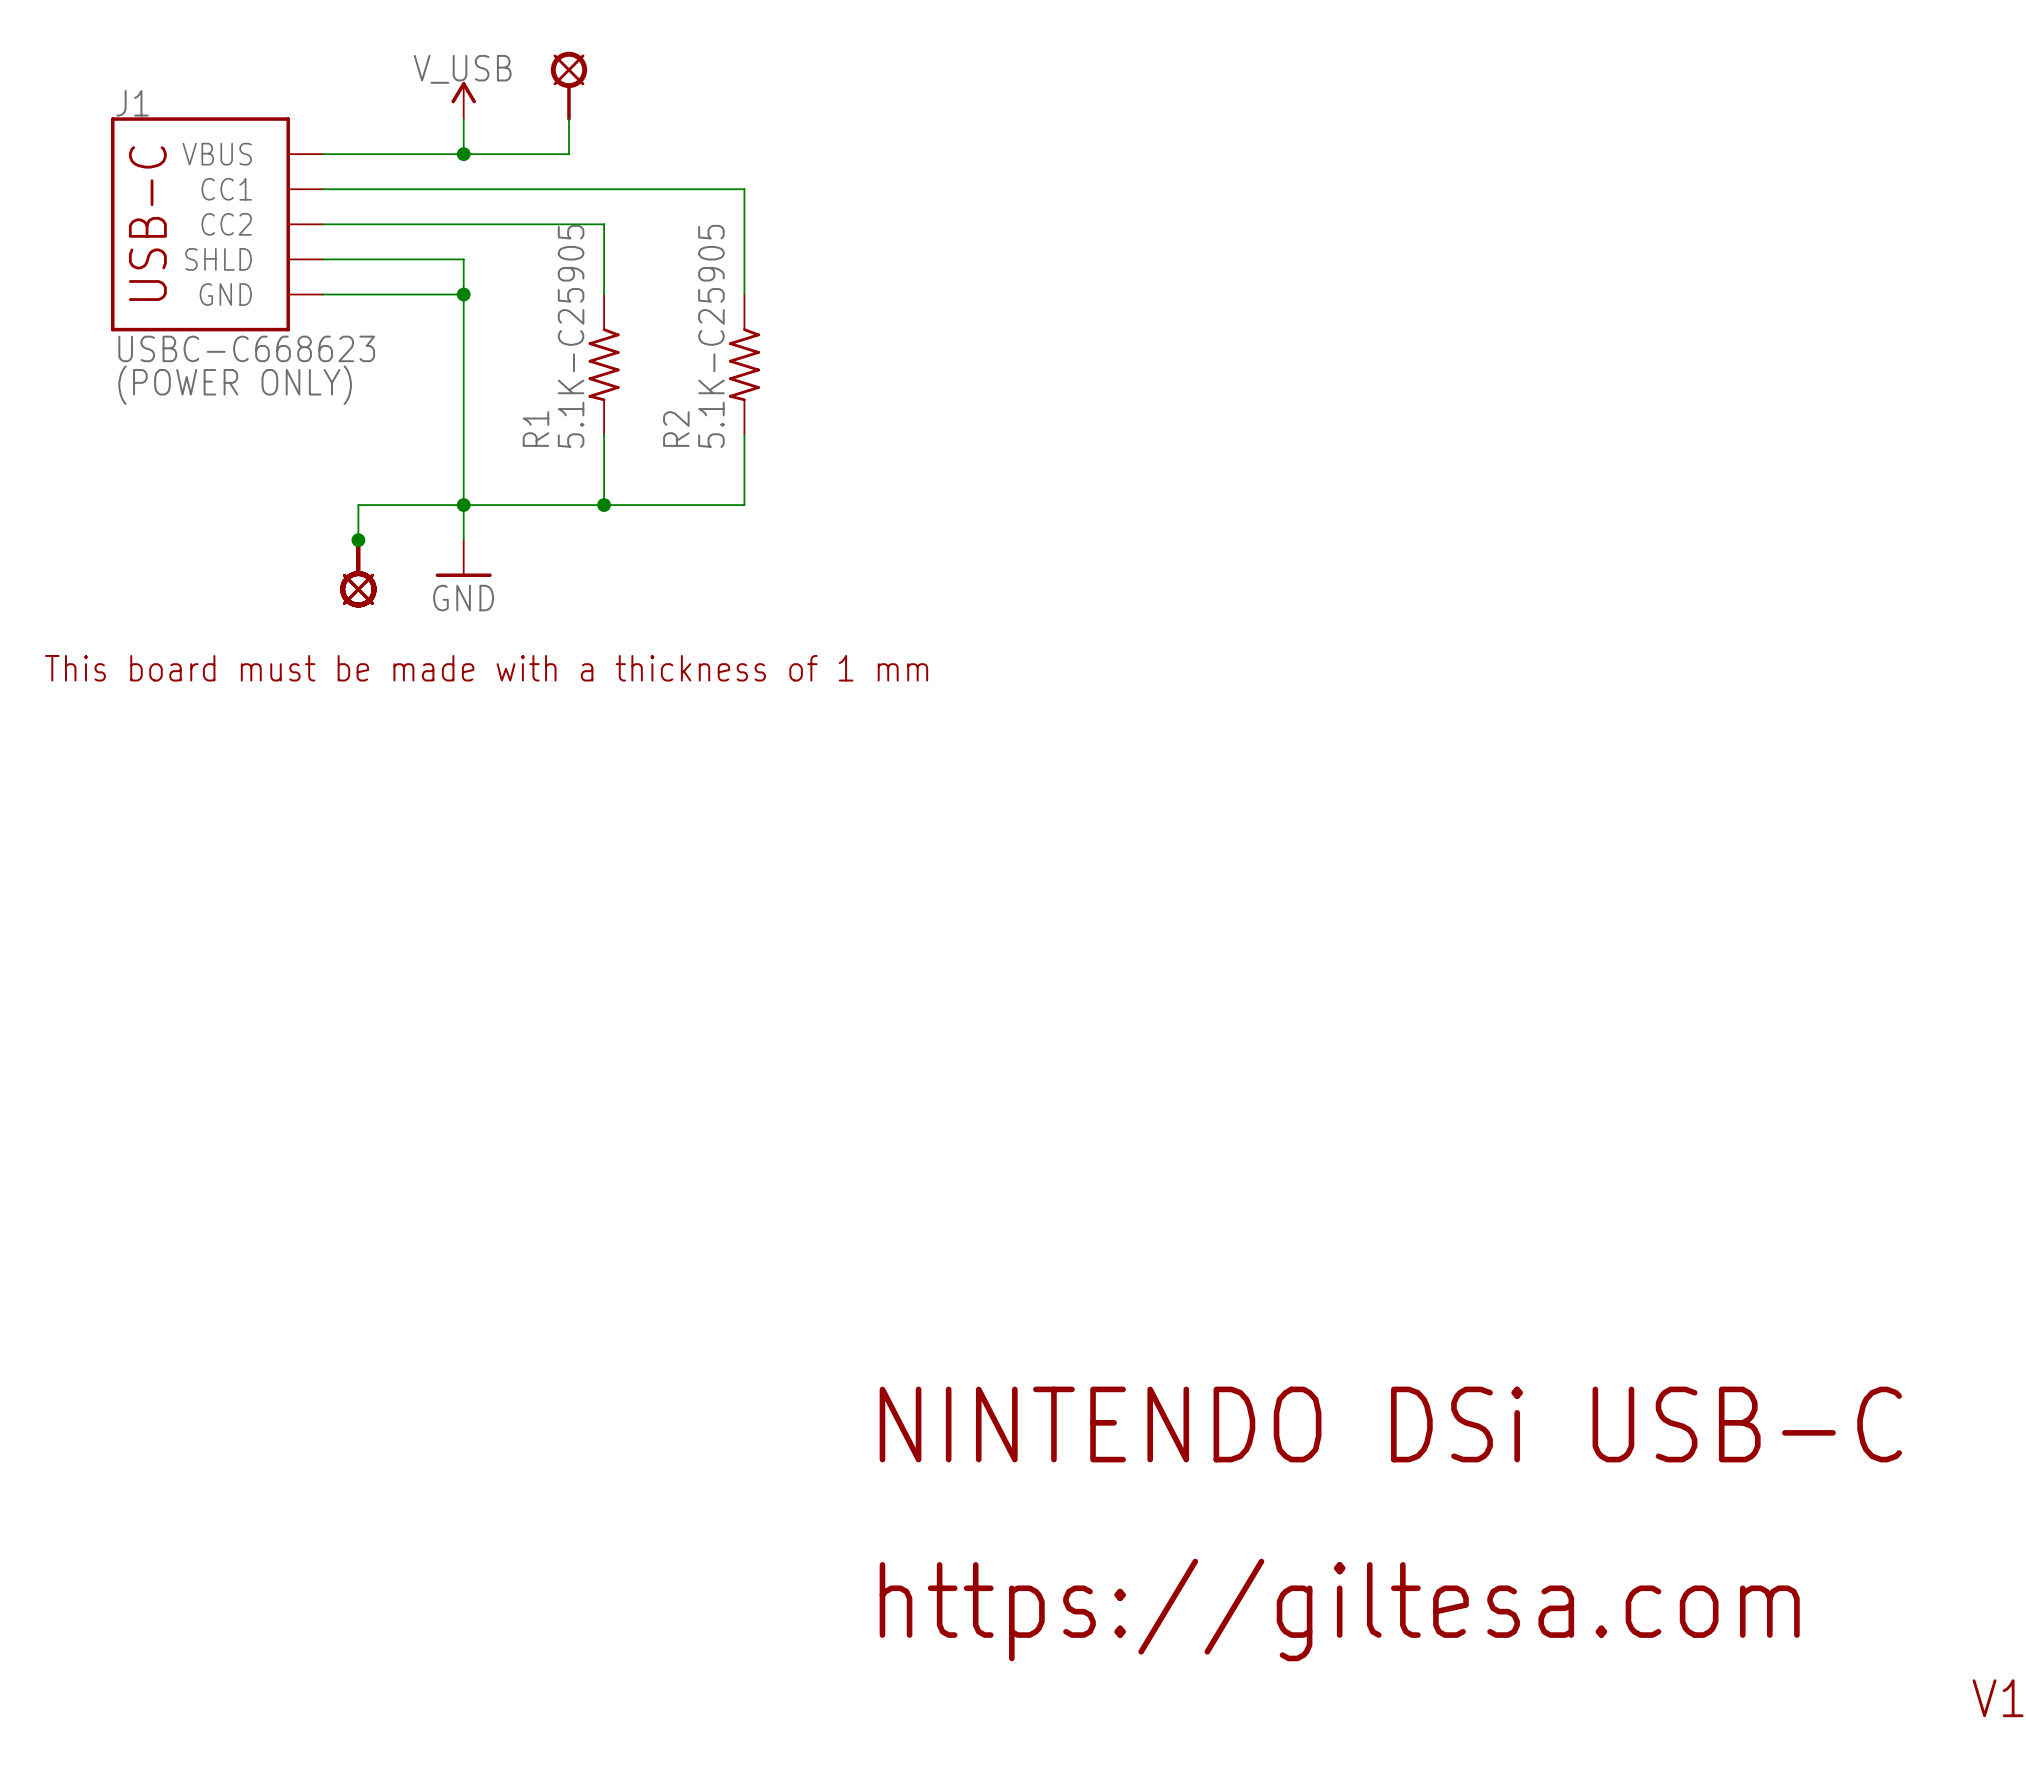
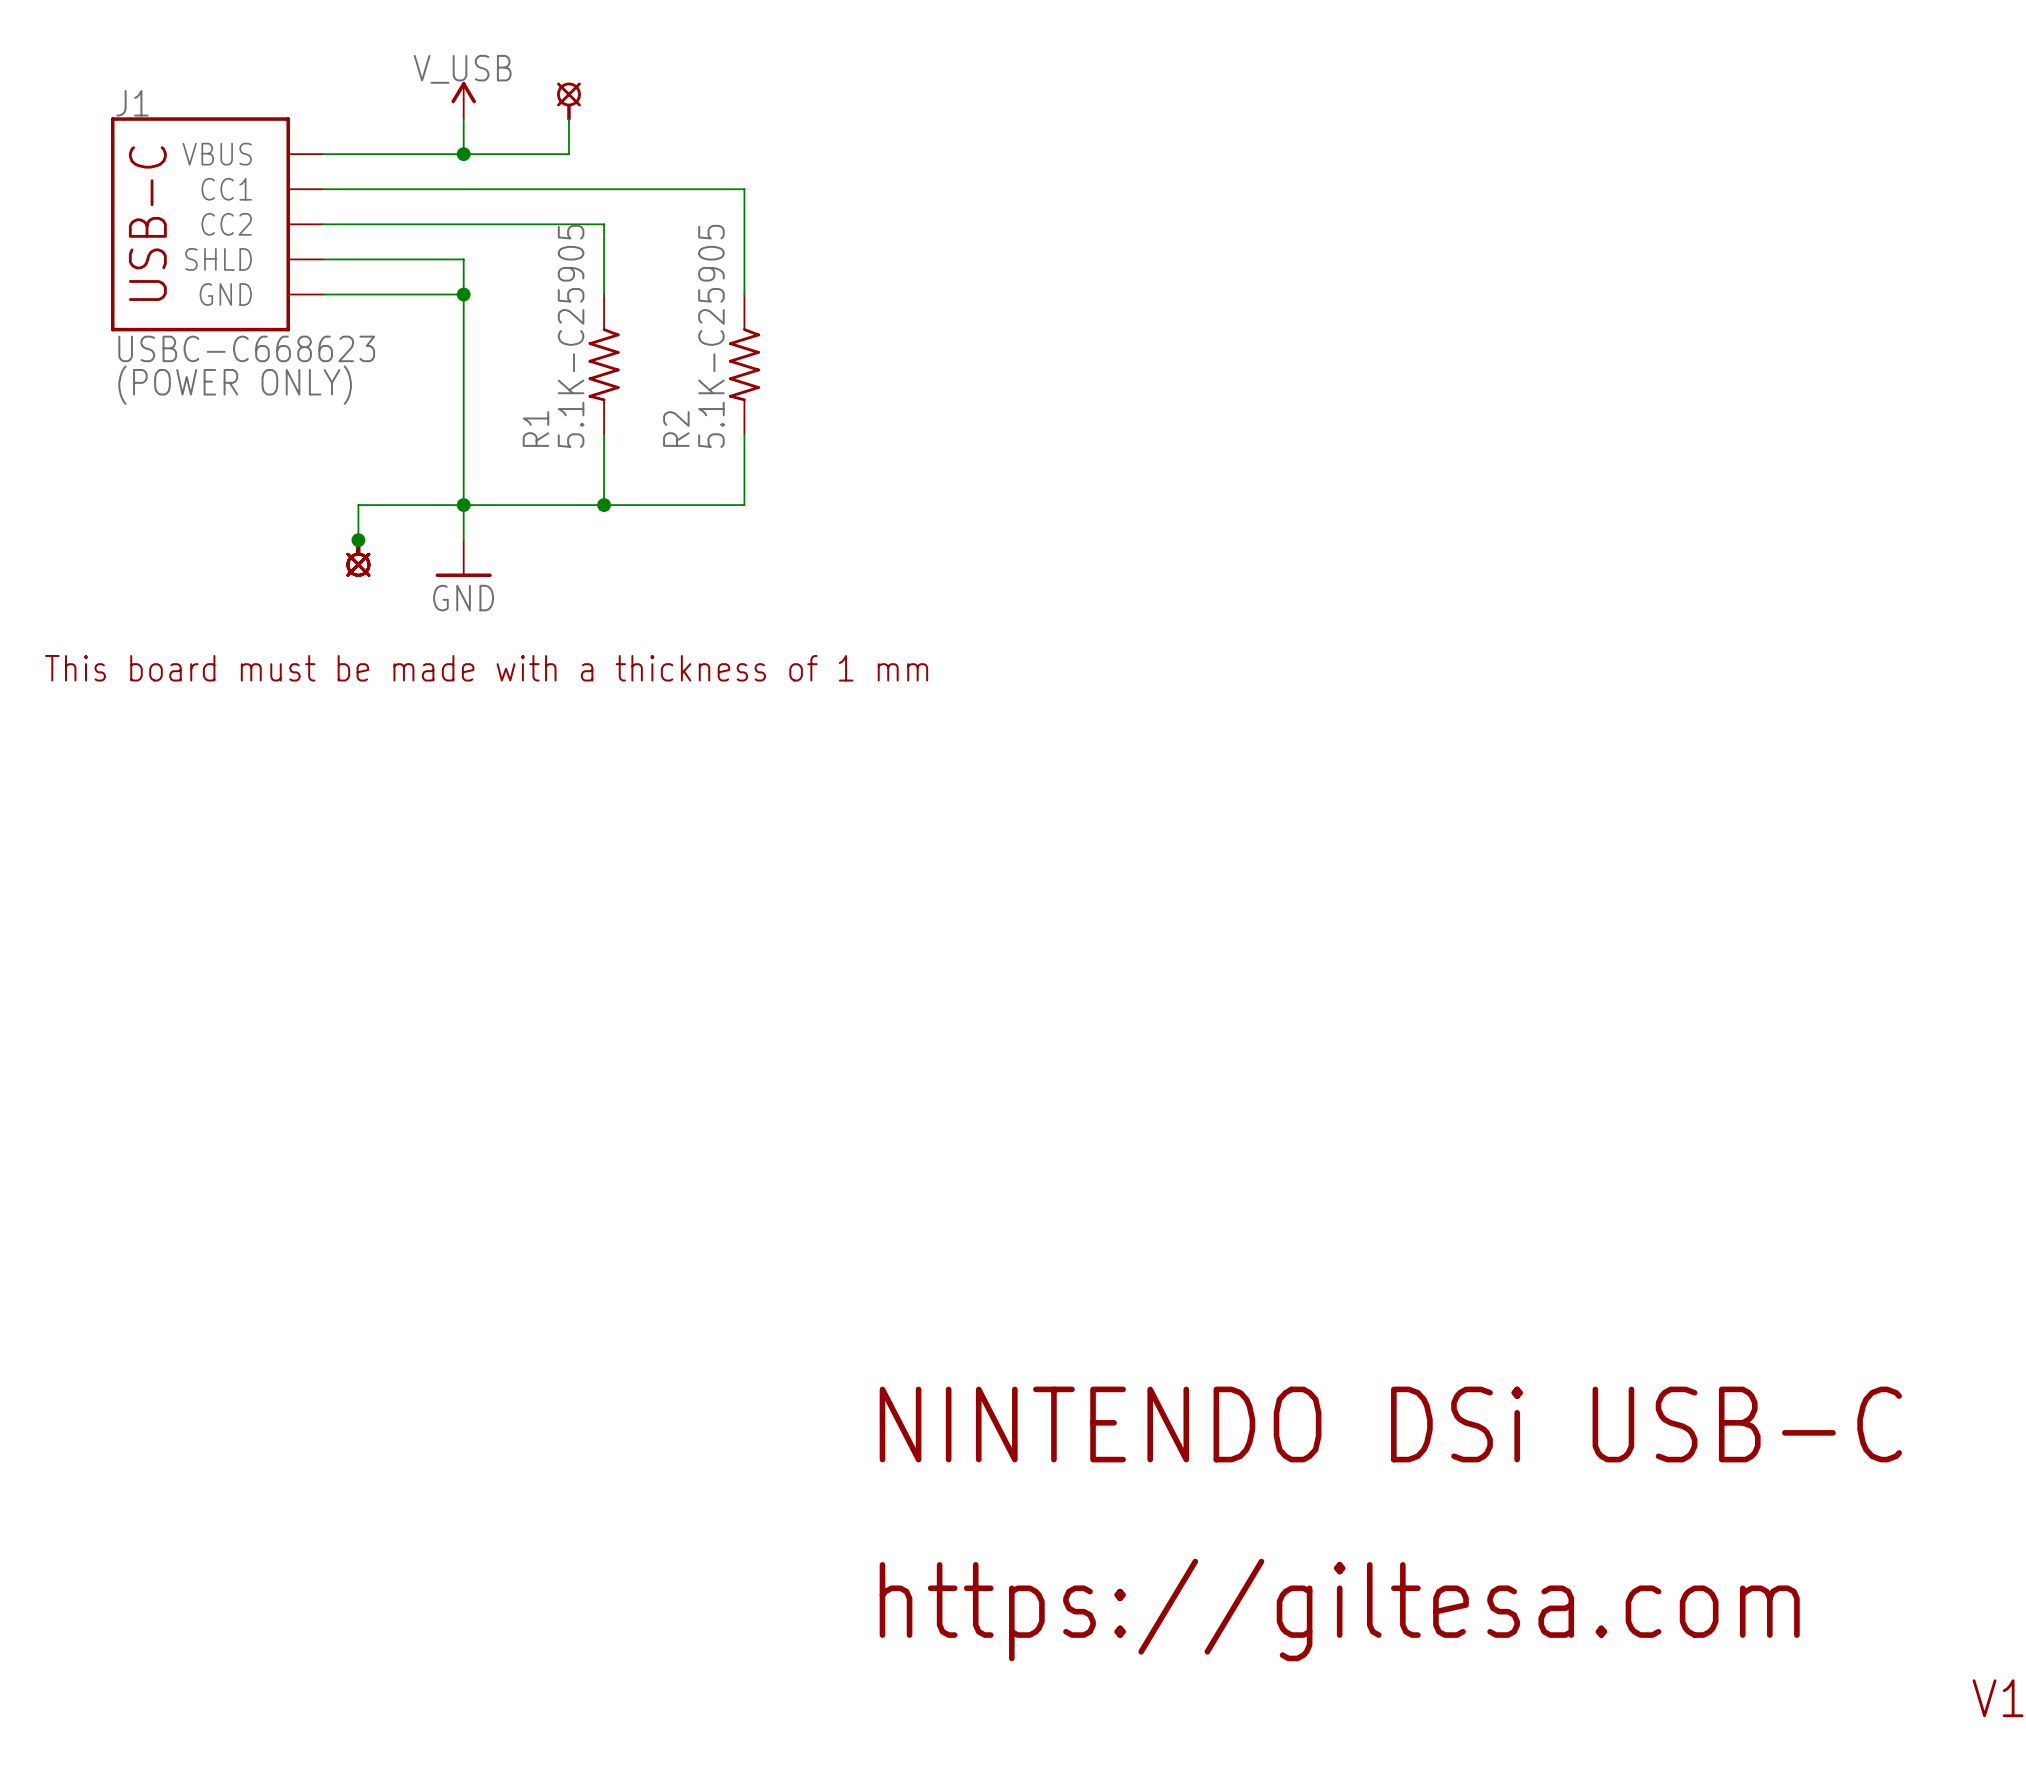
part: (568, 86) -> none
part: none -> (568, 101)
part: none -> (358, 557)
part: (358, 572) -> none

